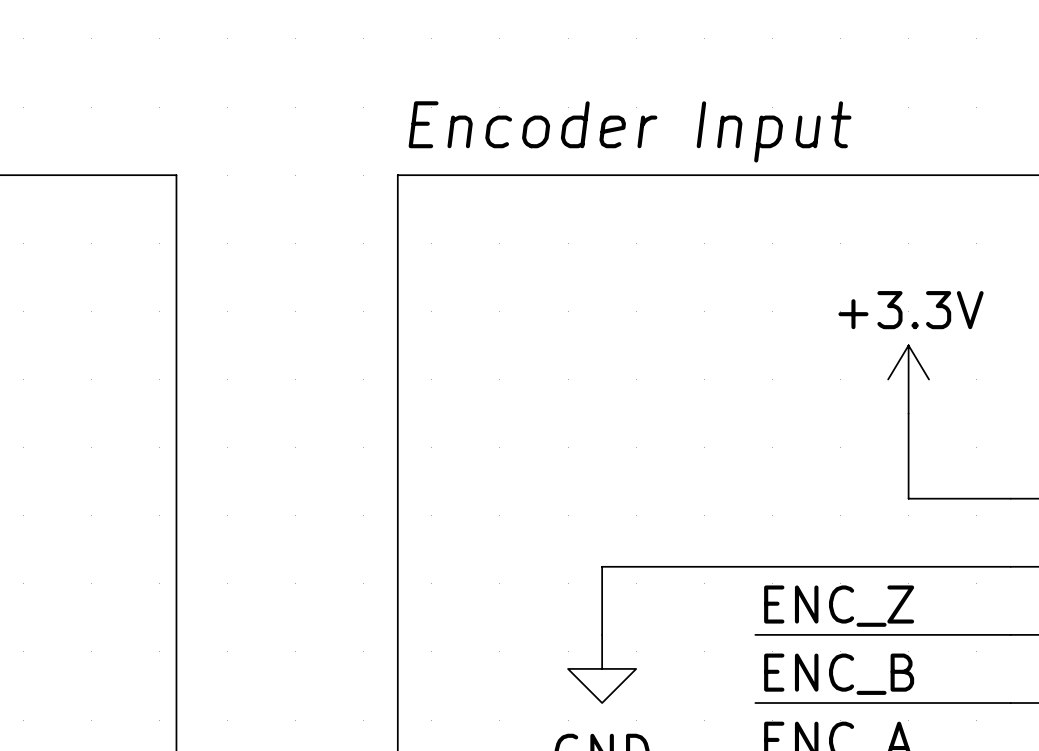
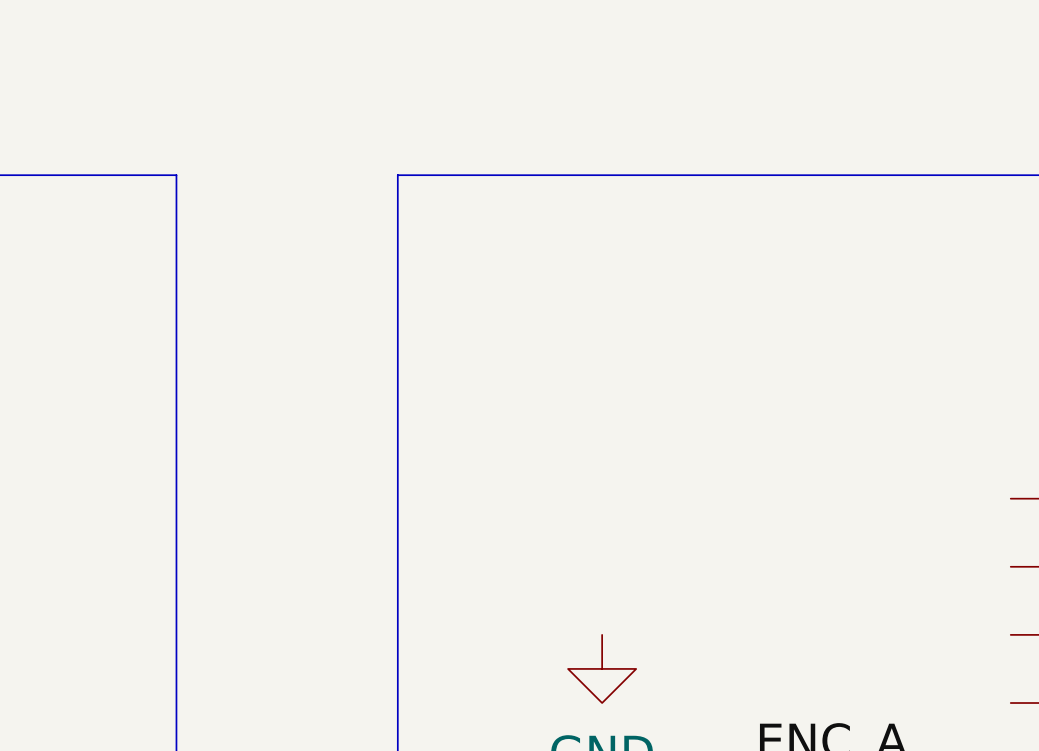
text: Encoder Input (630, 131) -> none
power symbol: +3.3V (908, 379) -> none
wire: (908, 413) (908, 498) (1010, 498) -> none
wire: (1010, 566) (602, 566) (602, 634) -> none
label: ENC_Z (839, 606) -> none
wire: (755, 634) (1010, 634) -> none
label: ENC_B (839, 674) -> none
wire: (755, 703) (1010, 703) -> none

